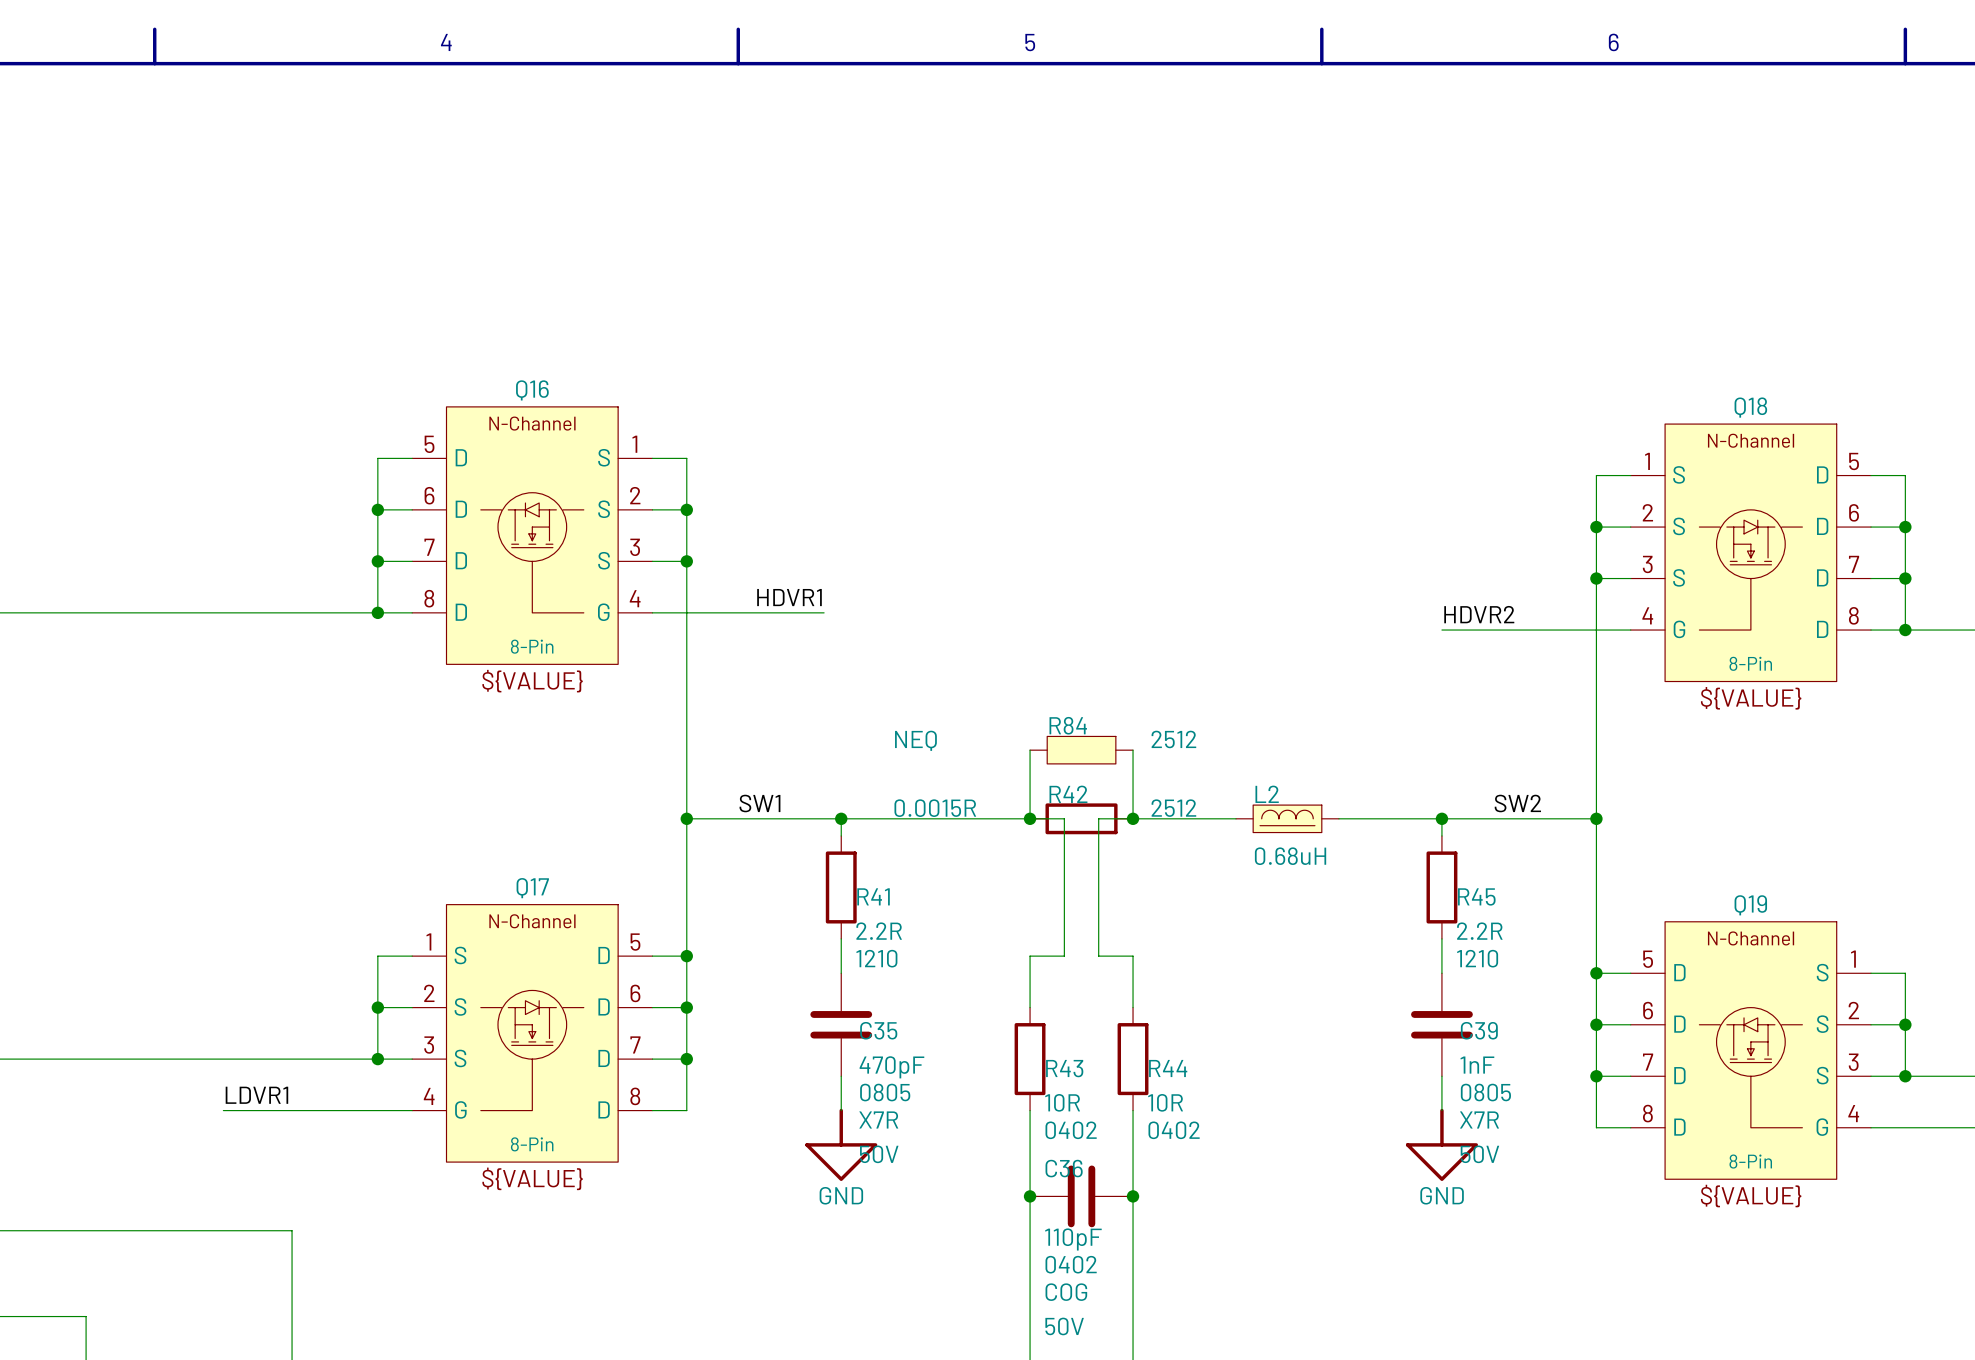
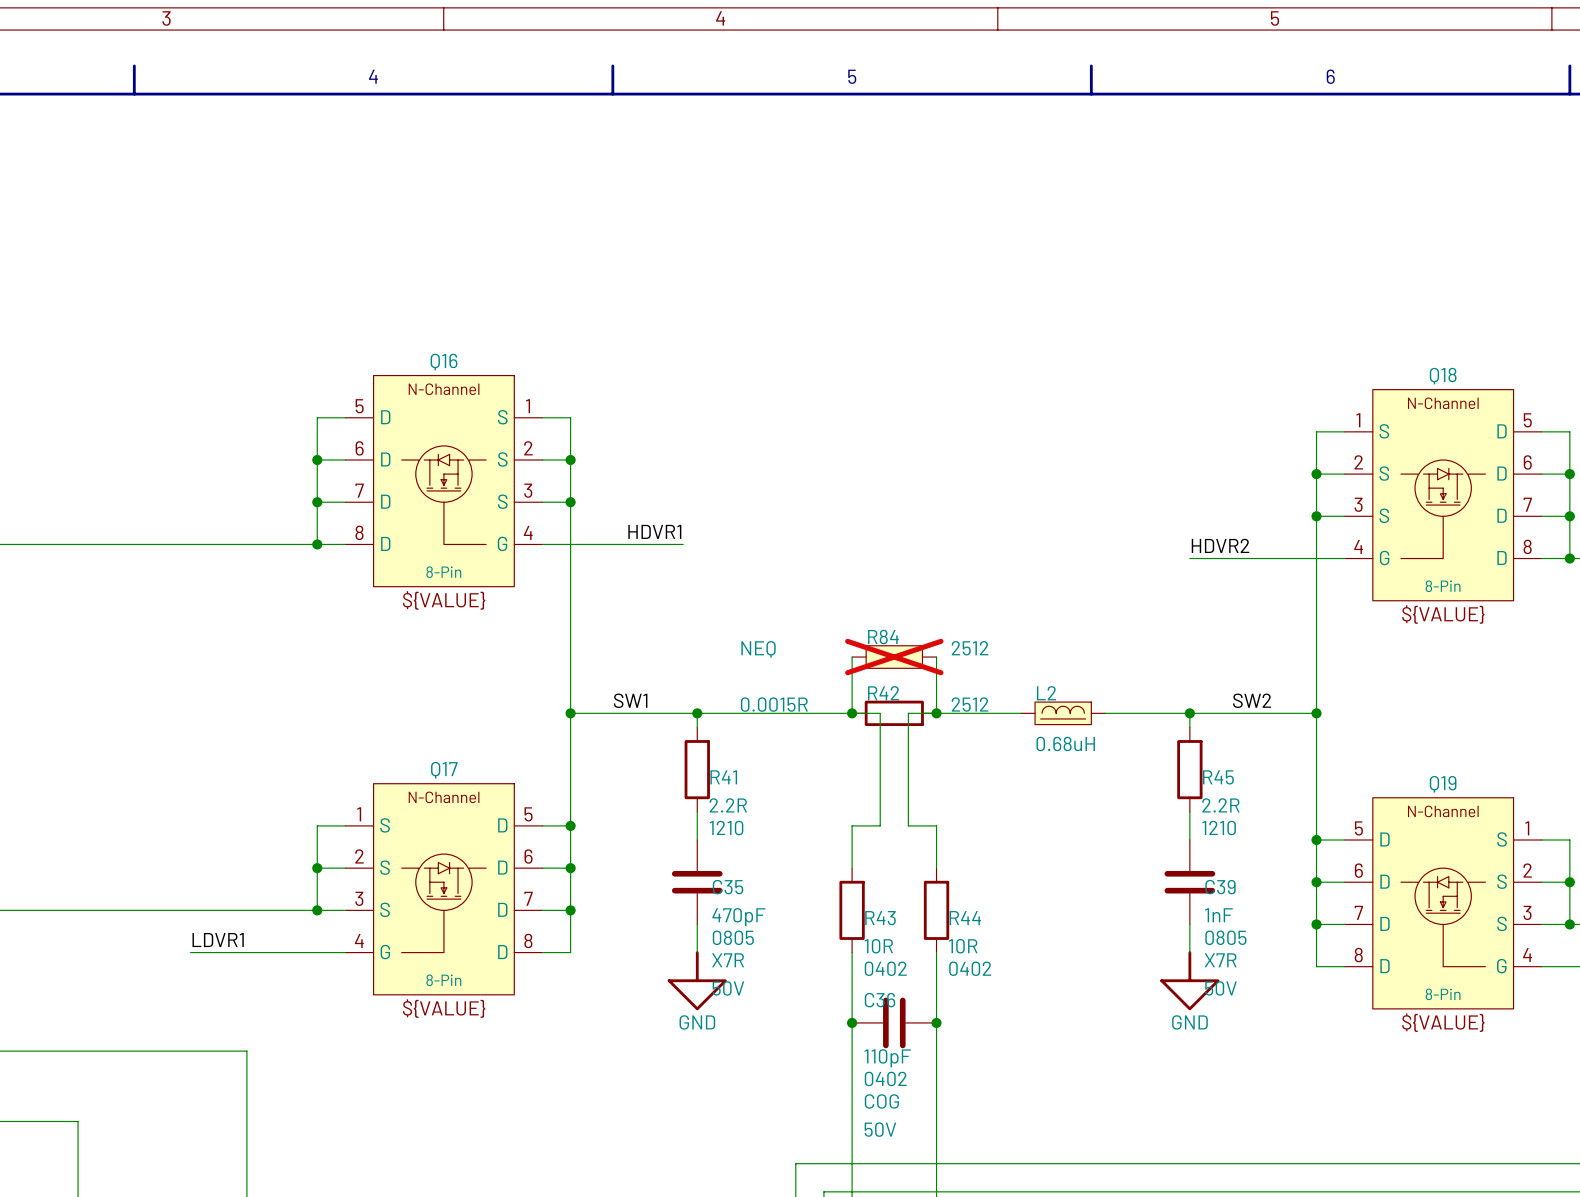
R84 do-not-place cross: none -> (894, 657)

